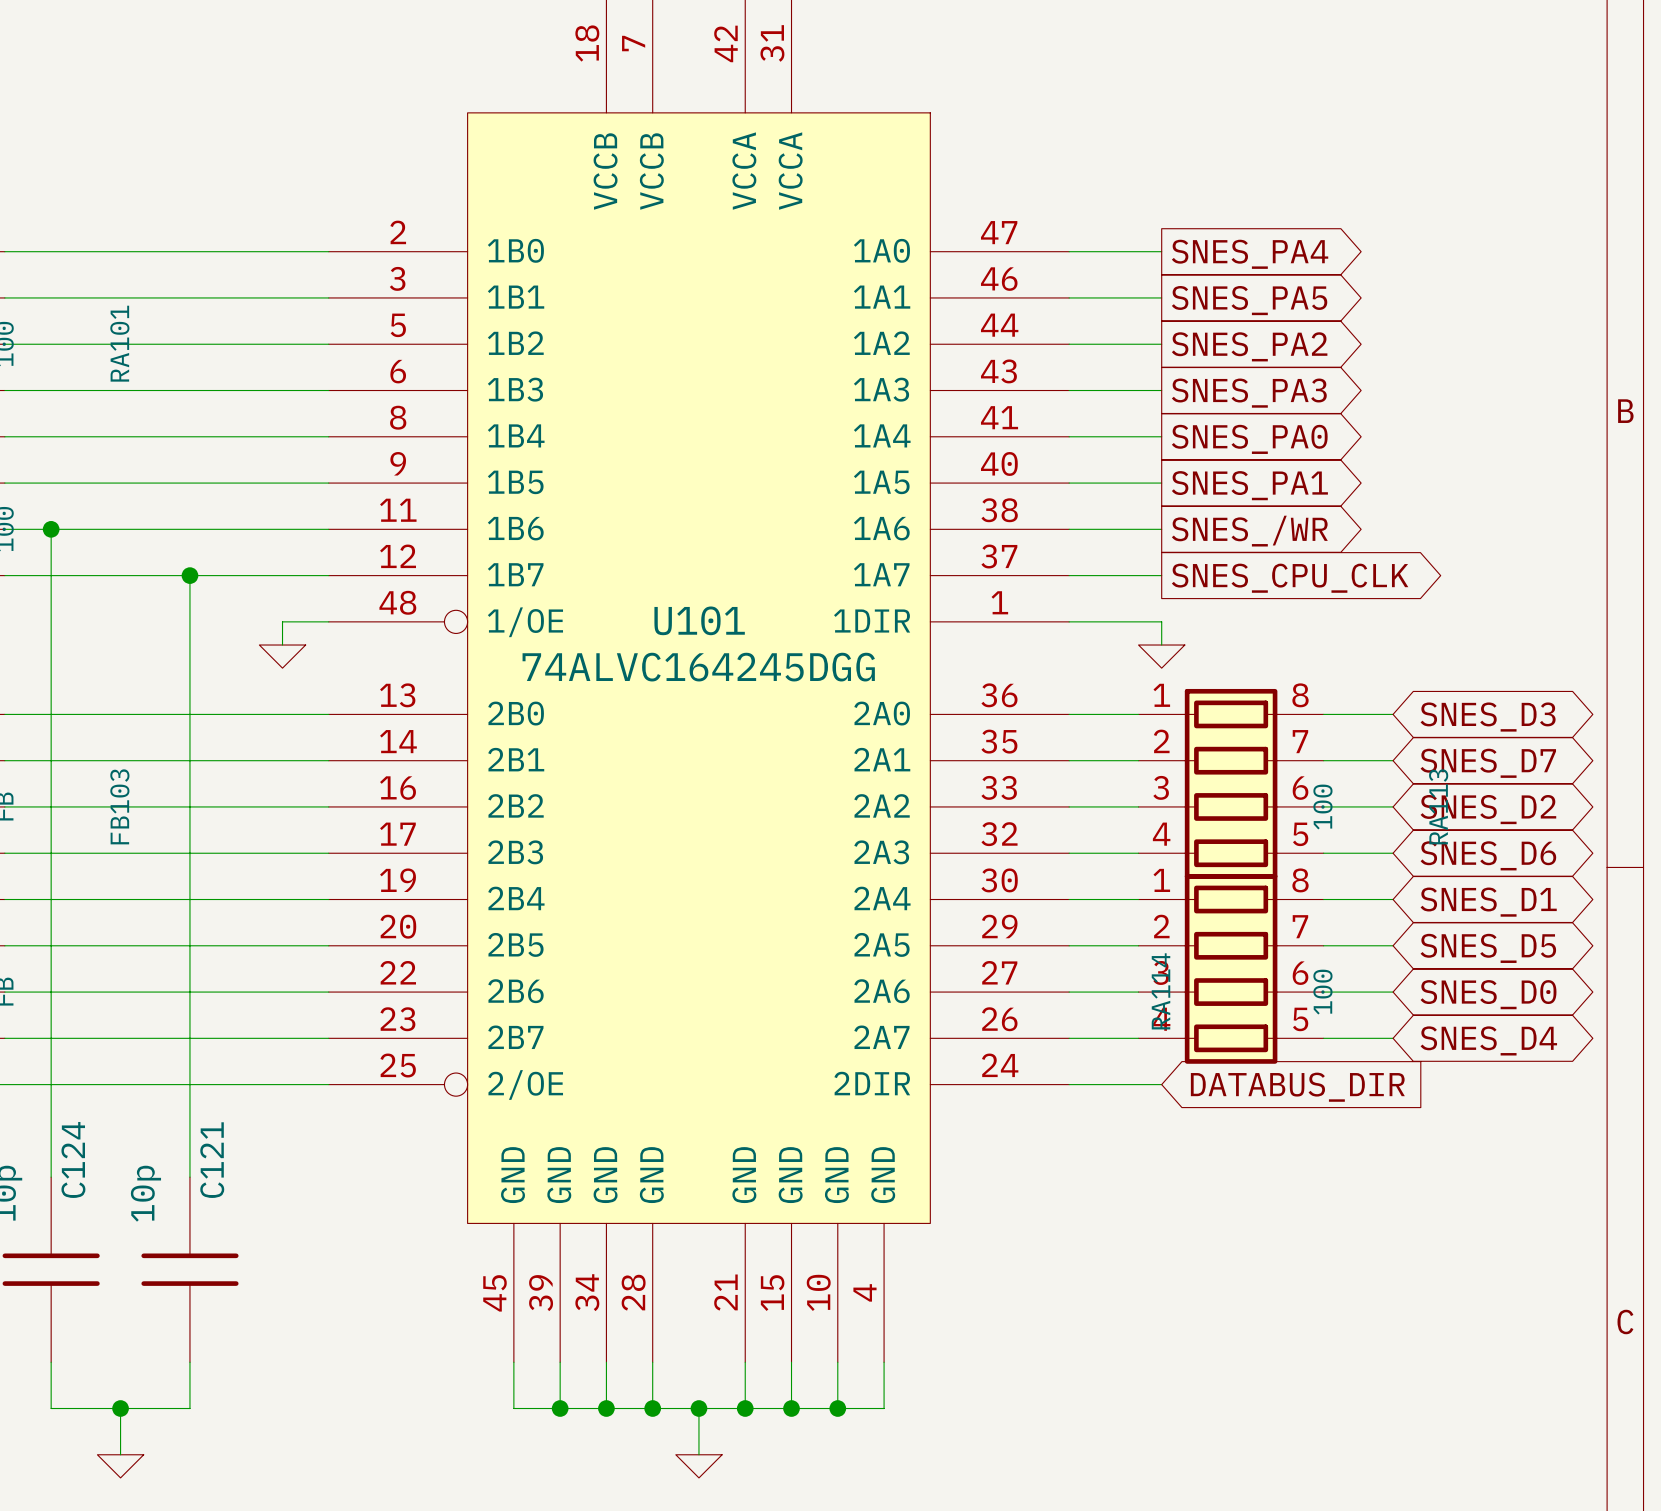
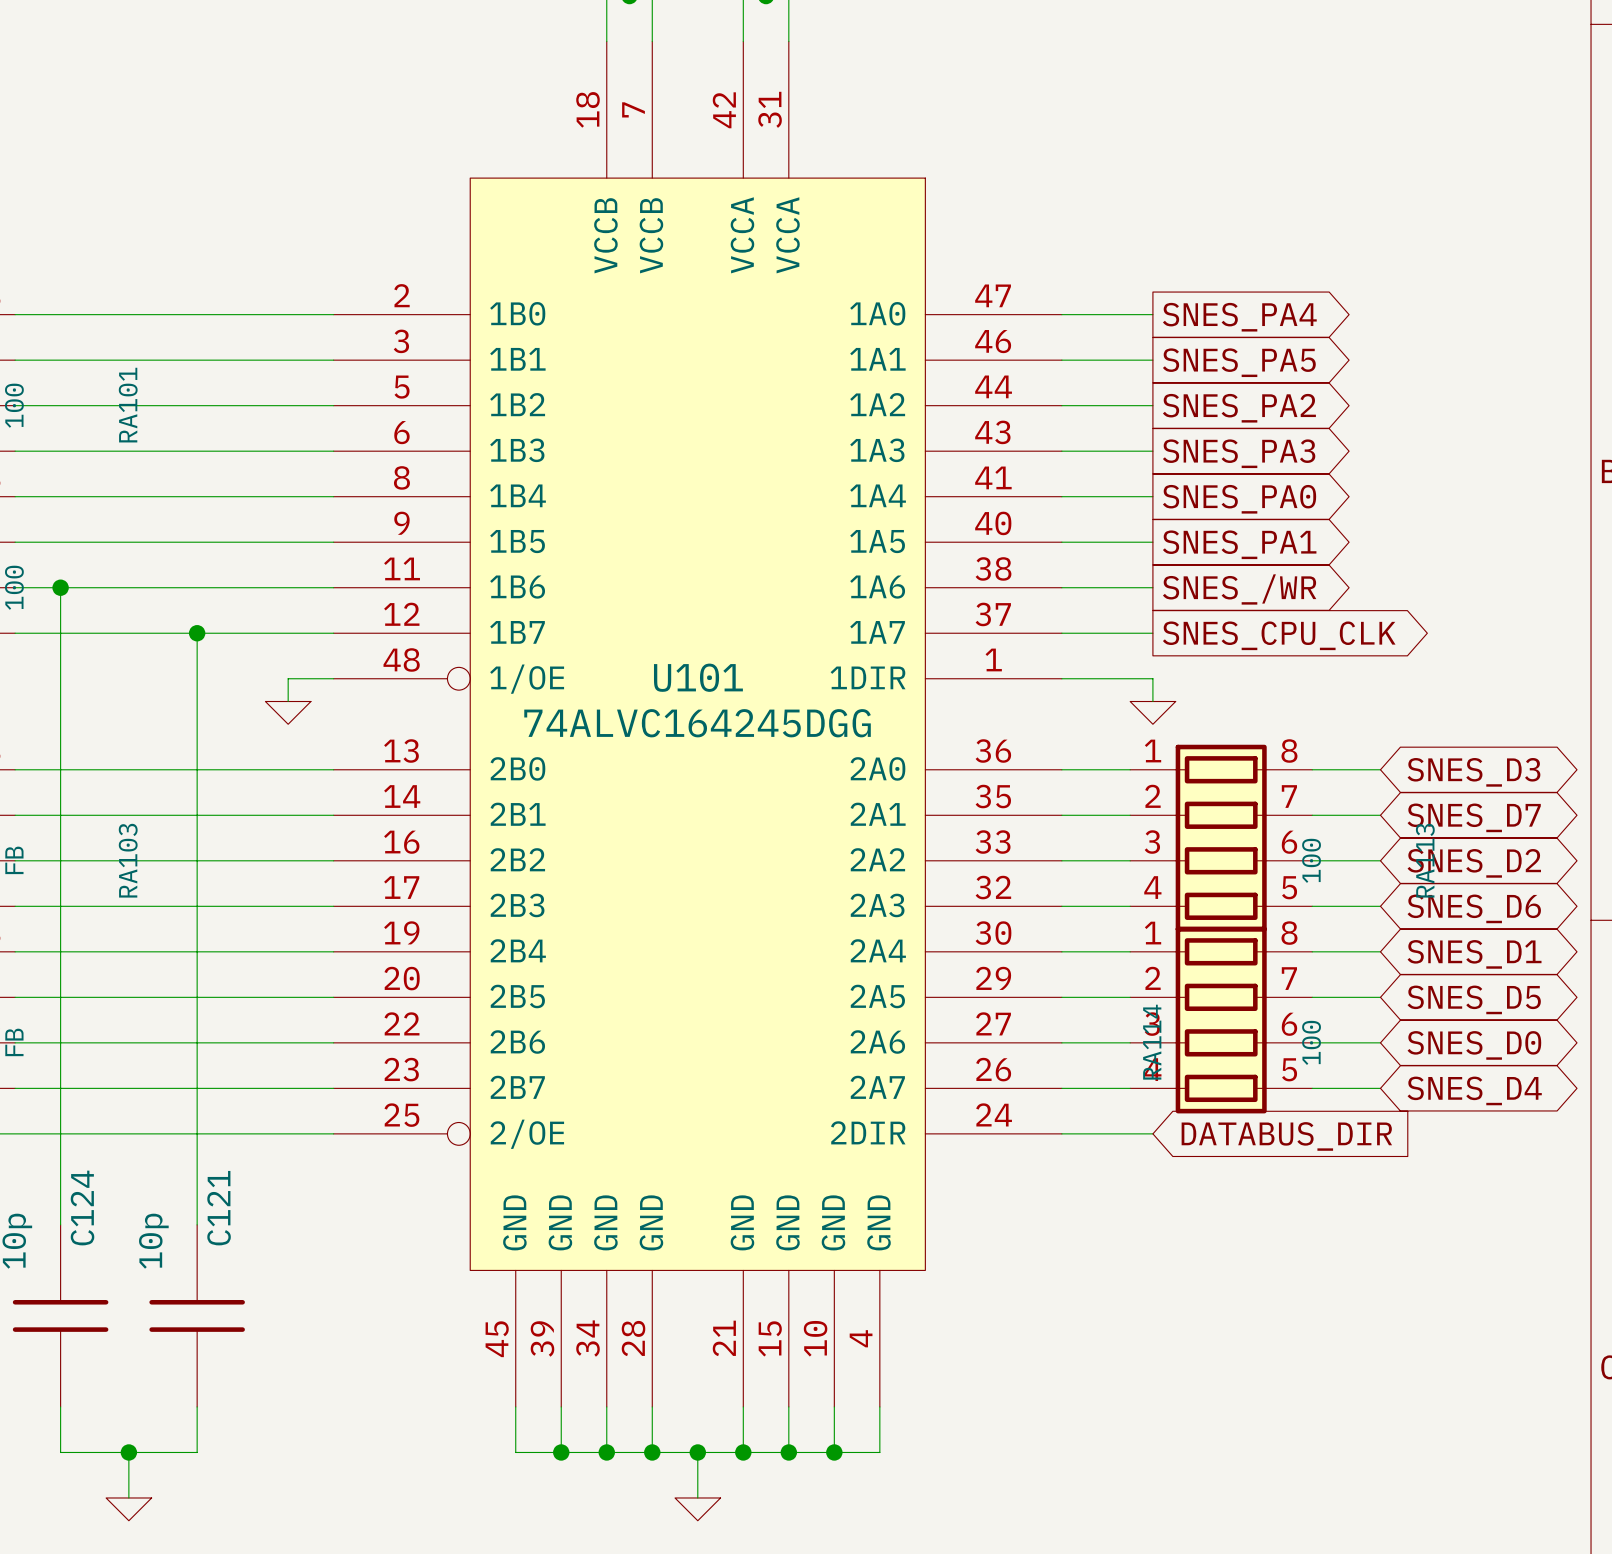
FB103 name: FB103 (119, 806) -> RA103 (128, 860)

